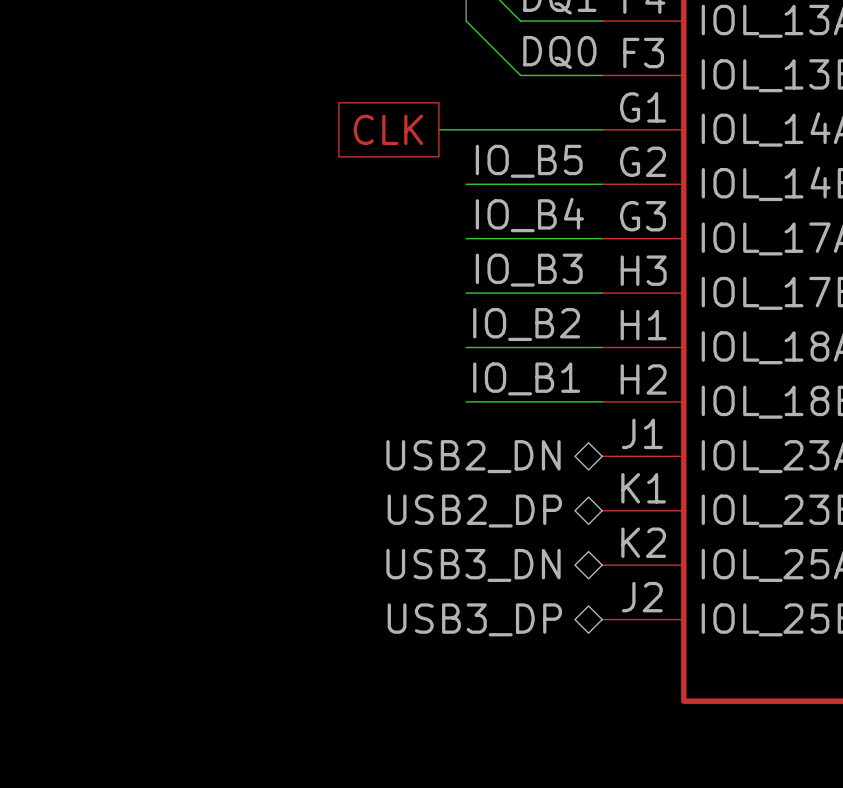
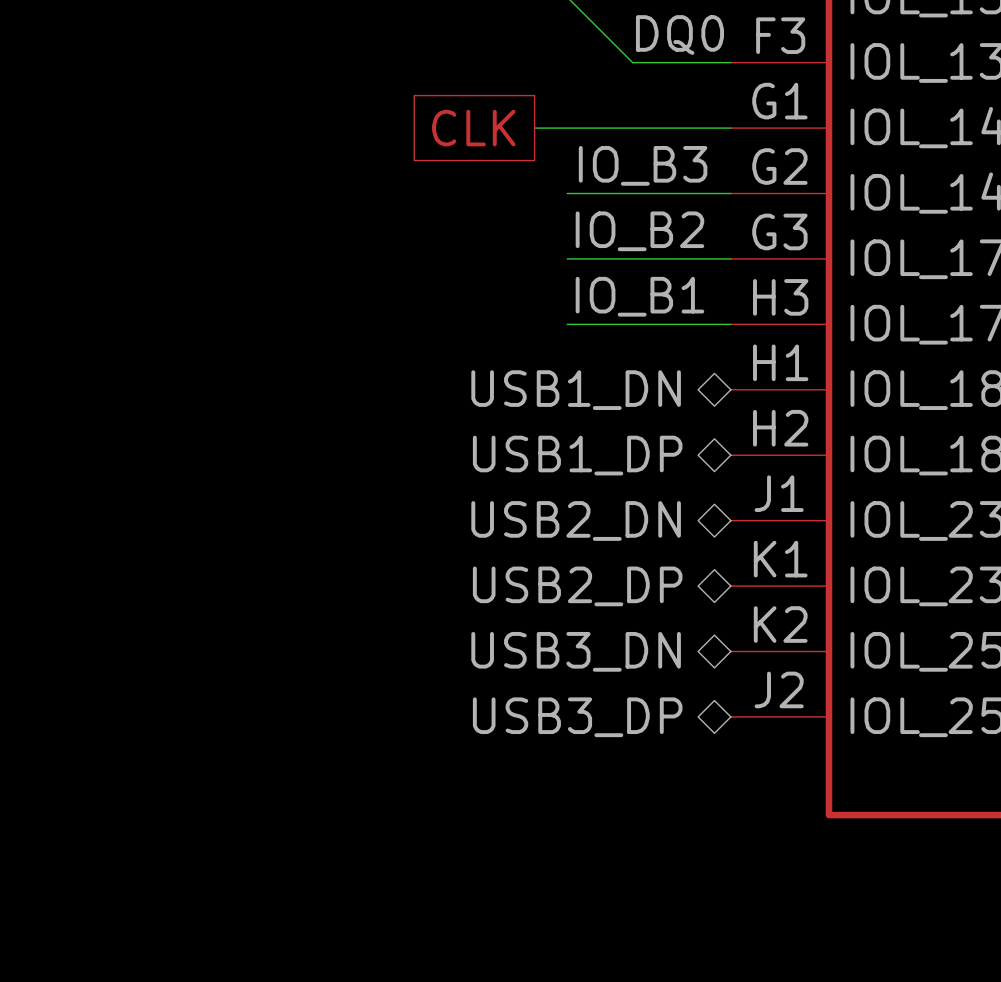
label: IO_B5 (529, 161) -> IO_B3 (643, 165)
label: IO_B4 (529, 215) -> IO_B2 (639, 231)
label: IO_B3 (529, 270) -> IO_B1 (639, 296)
label: IO_B2 (526, 324) -> none
wire: (466, 347) (602, 347) -> none
hierarchical label: none -> USB1_DN (576, 390)
label: IO_B1 (526, 378) -> none
wire: (466, 401) (602, 401) -> none
hierarchical label: none -> USB1_DP (577, 455)

